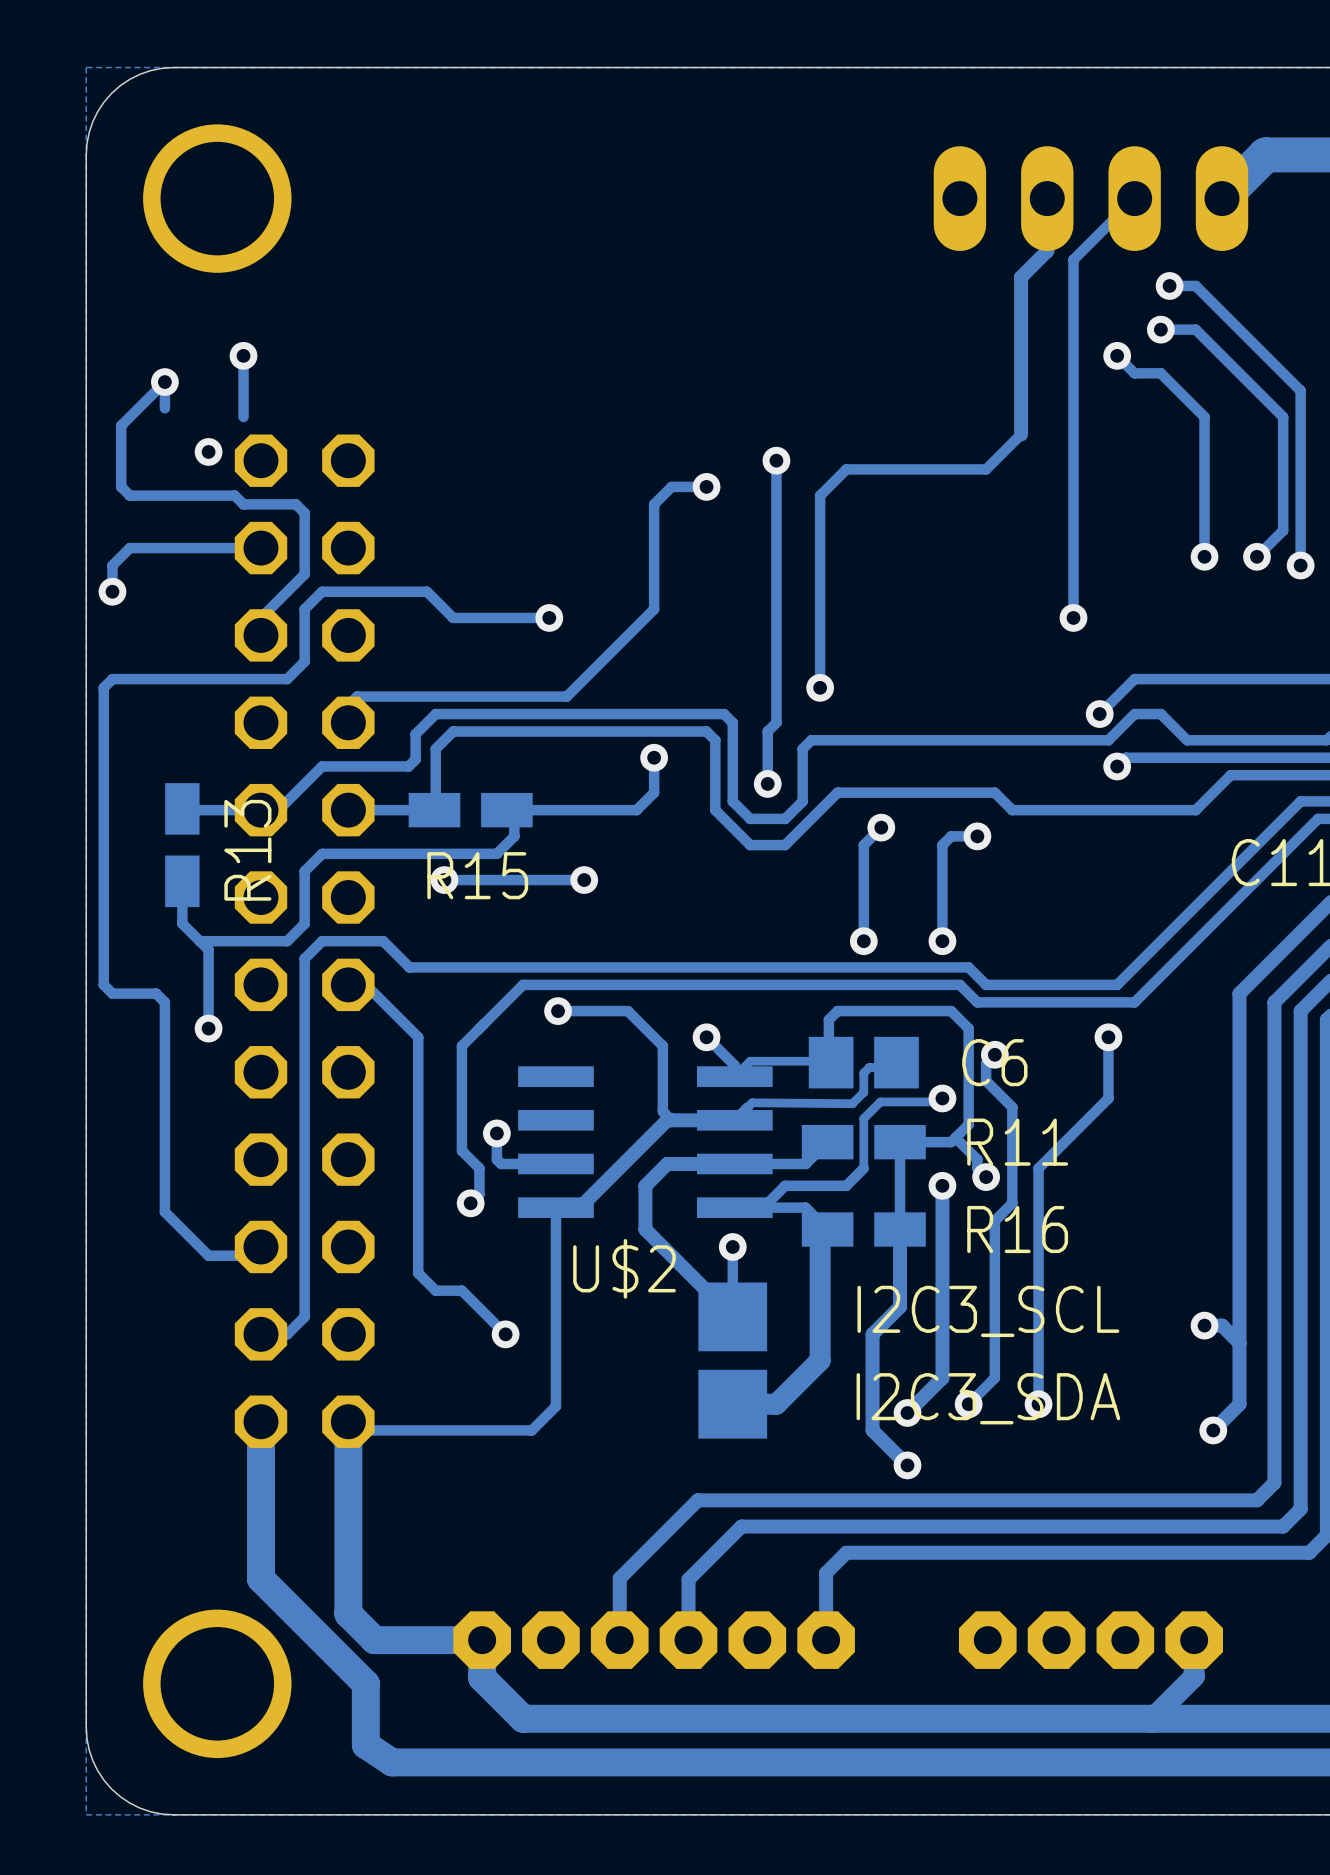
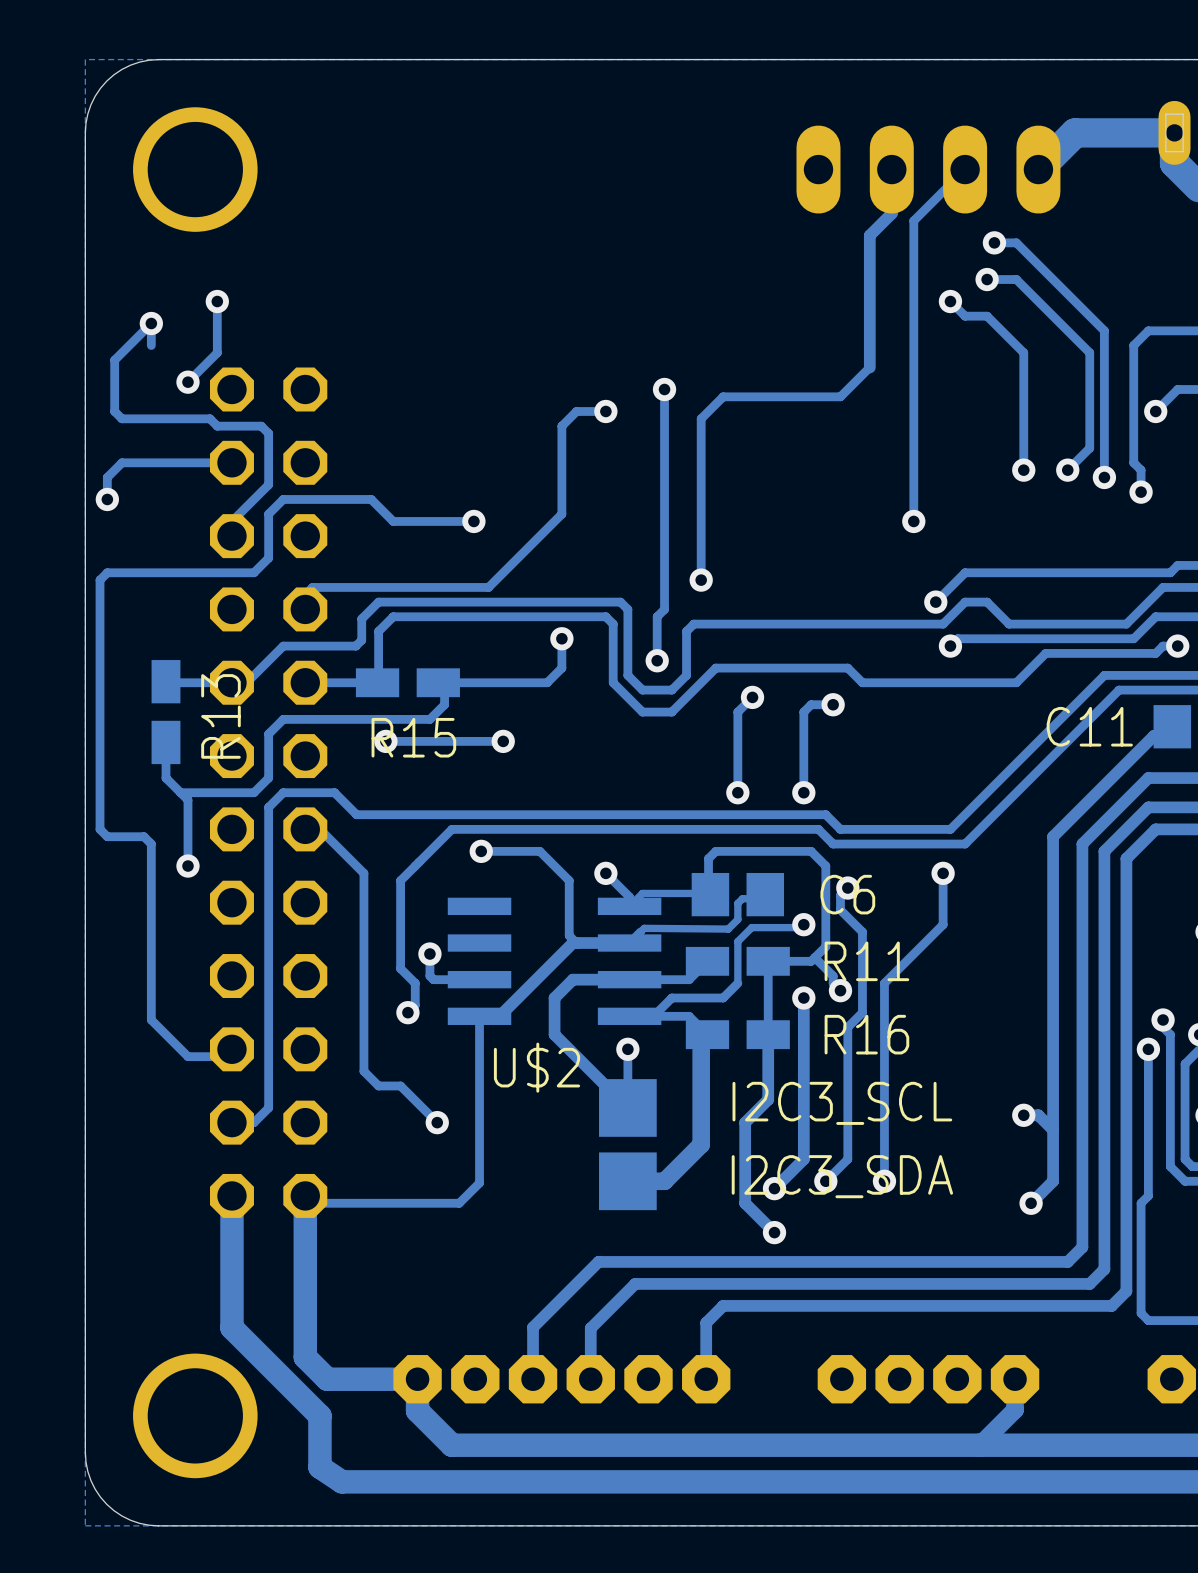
track: none -> (217, 352) (187, 382)

